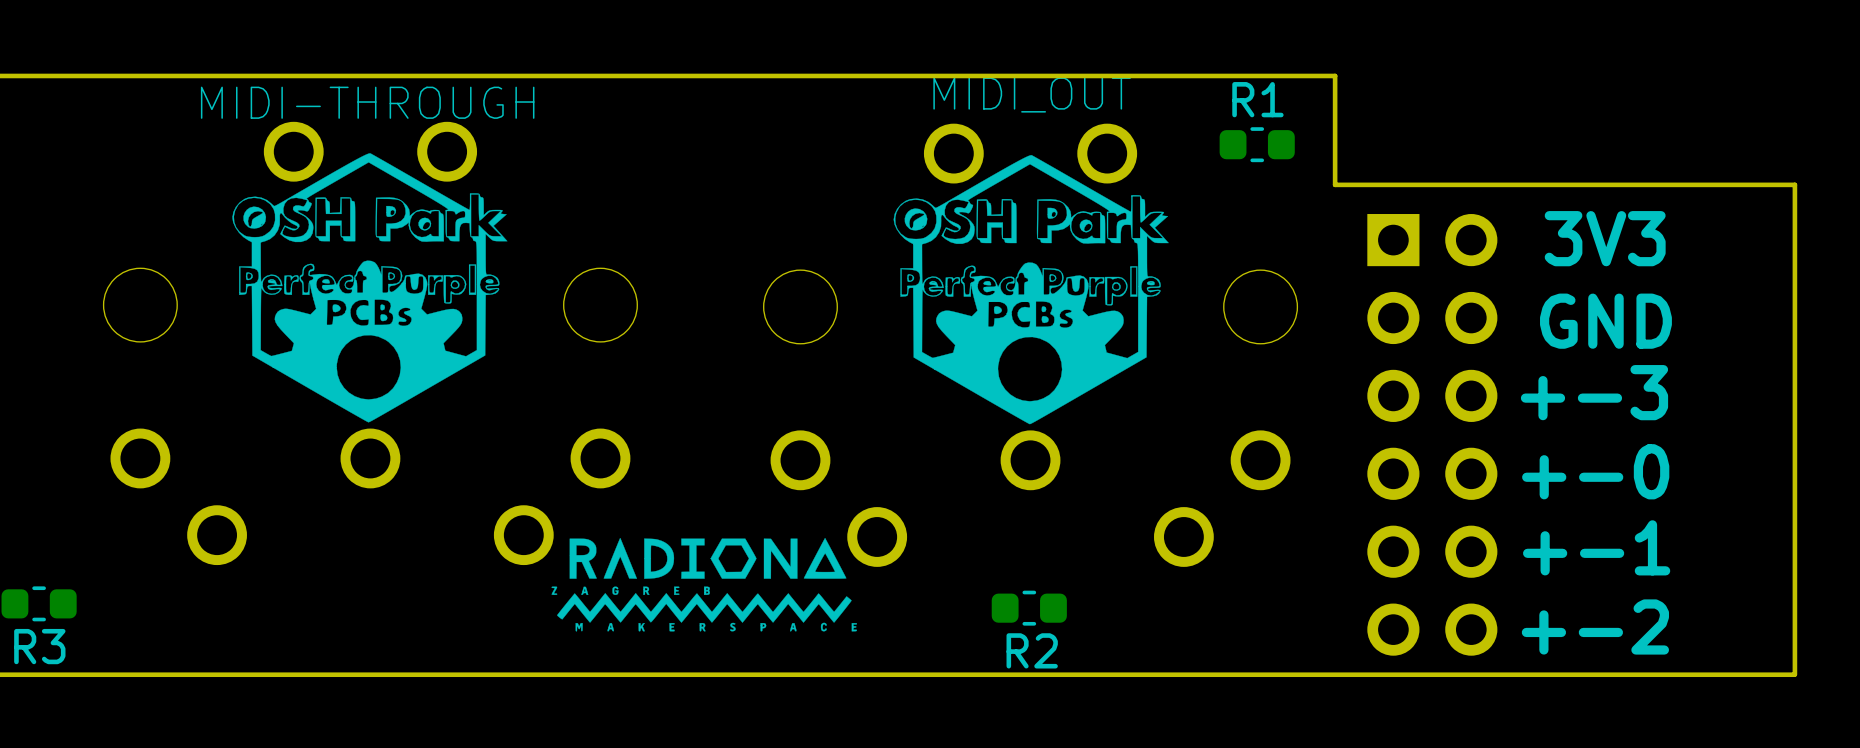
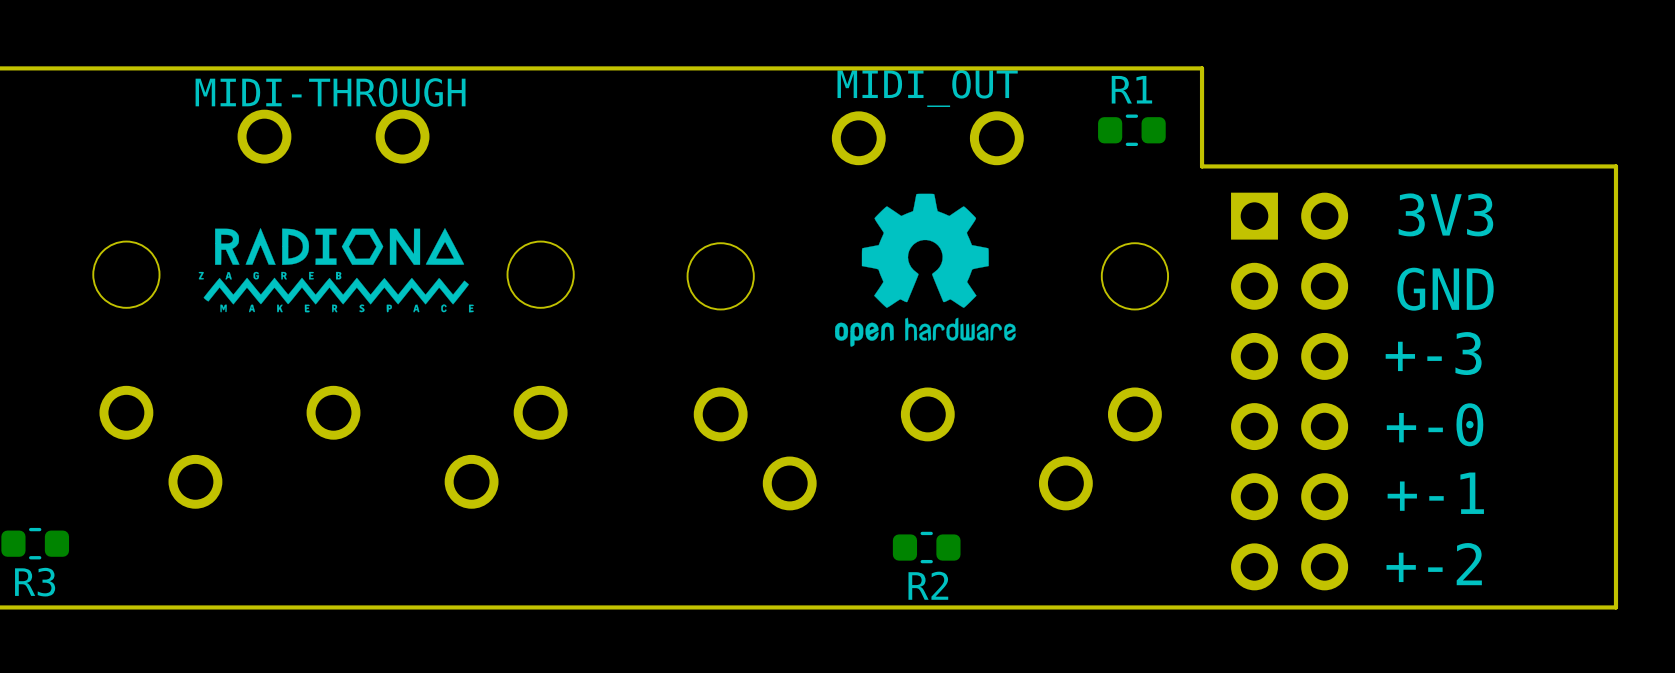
drawing: [232, 153, 508, 423] -> none
drawing shape: [893, 155, 1169, 425] -> [835, 193, 1016, 347]
drawing position: (704, 584) -> (336, 270)

